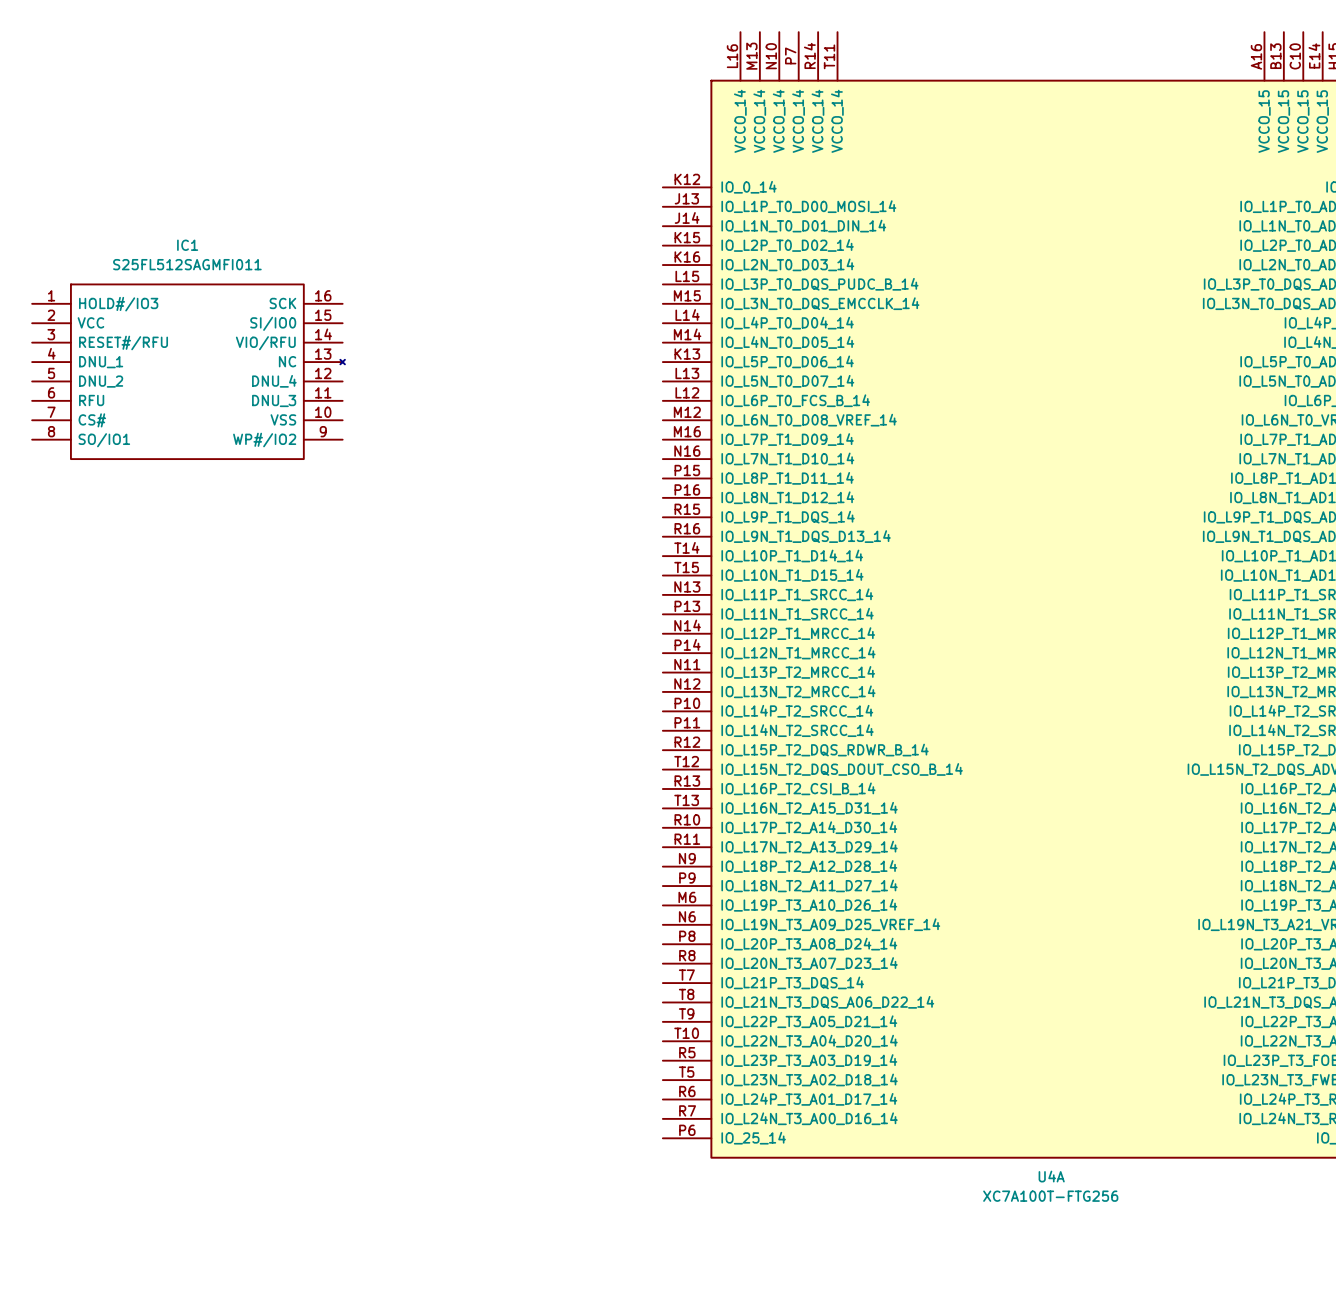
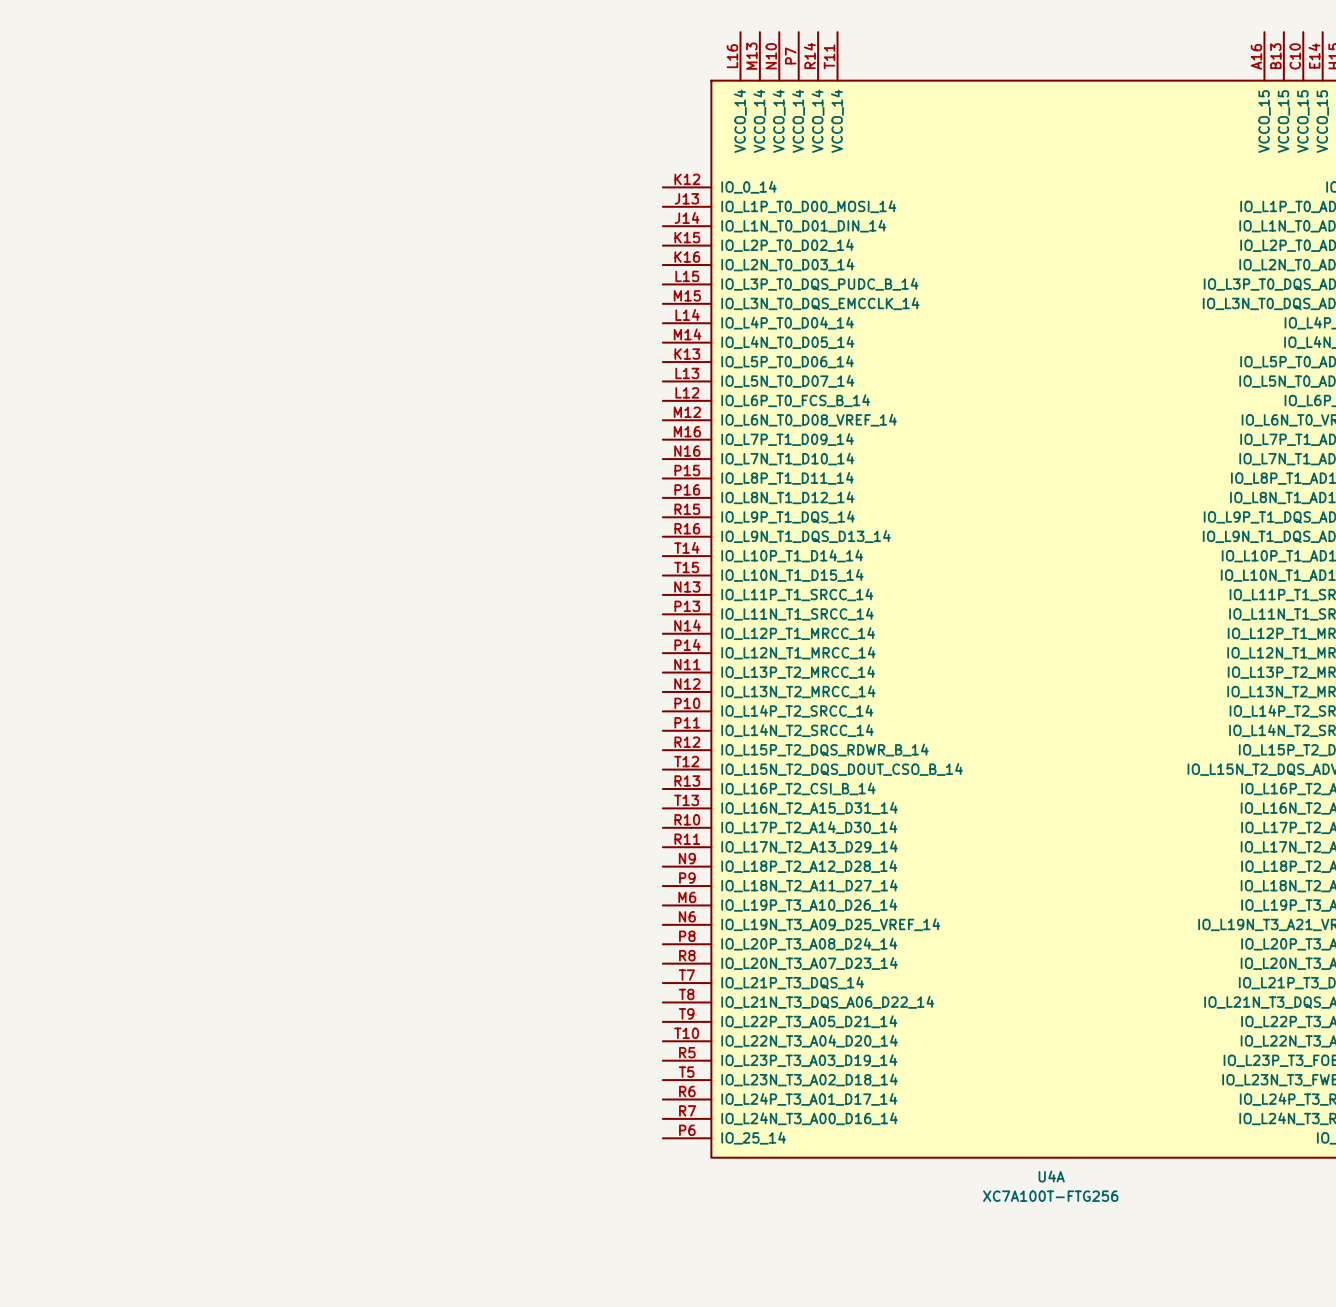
IC1: S25FL512SAGMFI011 (188, 371) -> none

